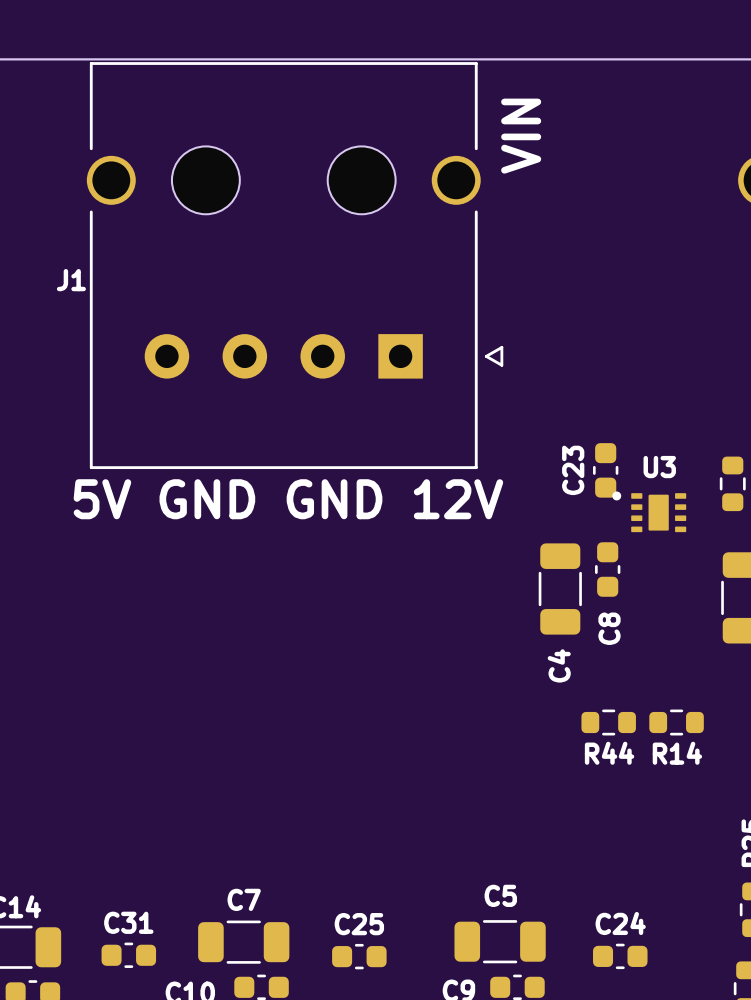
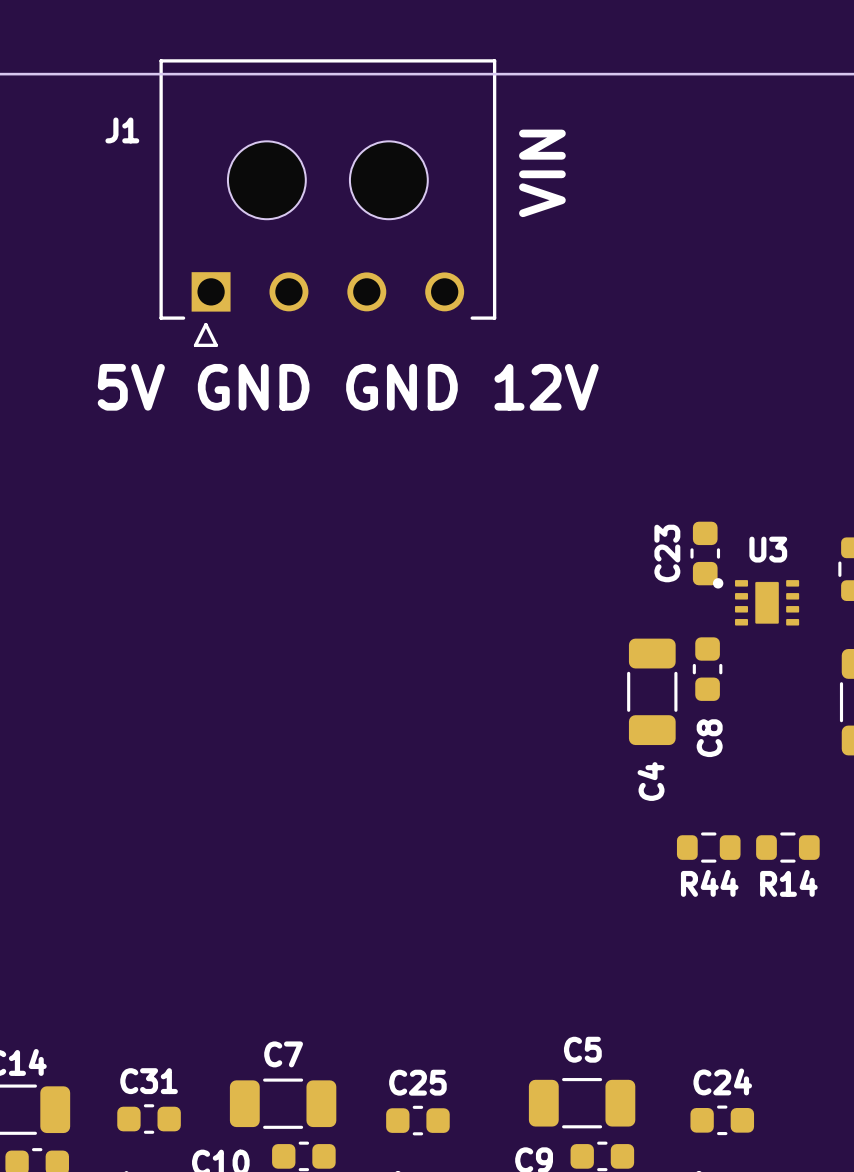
J1 footprint: [86, 62, 504, 470] -> [159, 59, 497, 347]
text position: VIN (521, 136) -> VIN (542, 173)
J1 name position: J1 (71, 280) -> J1 (122, 130)
text position: 5V GND GND 12V (288, 499) -> 5V GND GND 12V (348, 387)

